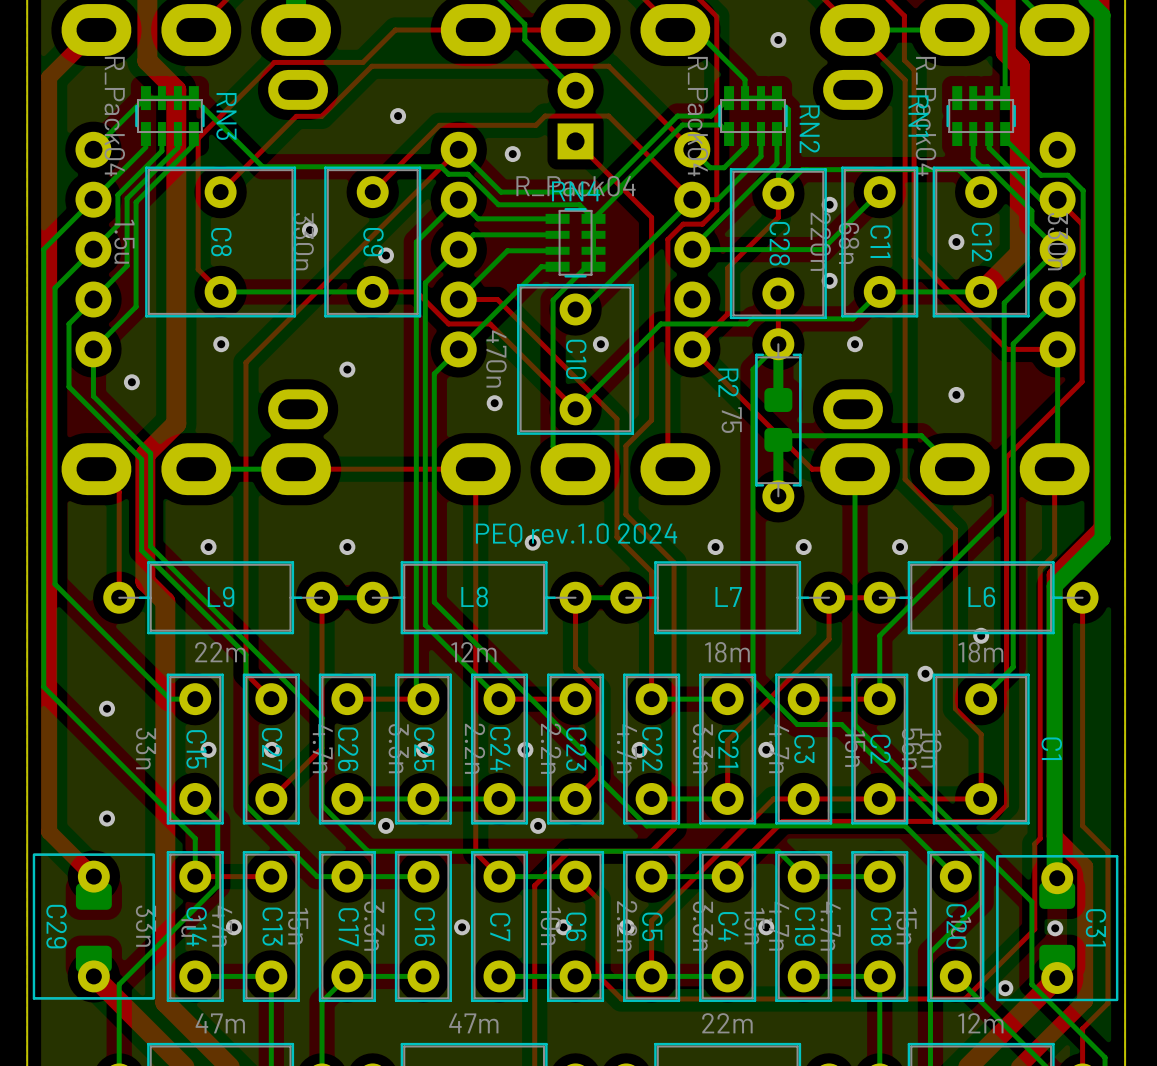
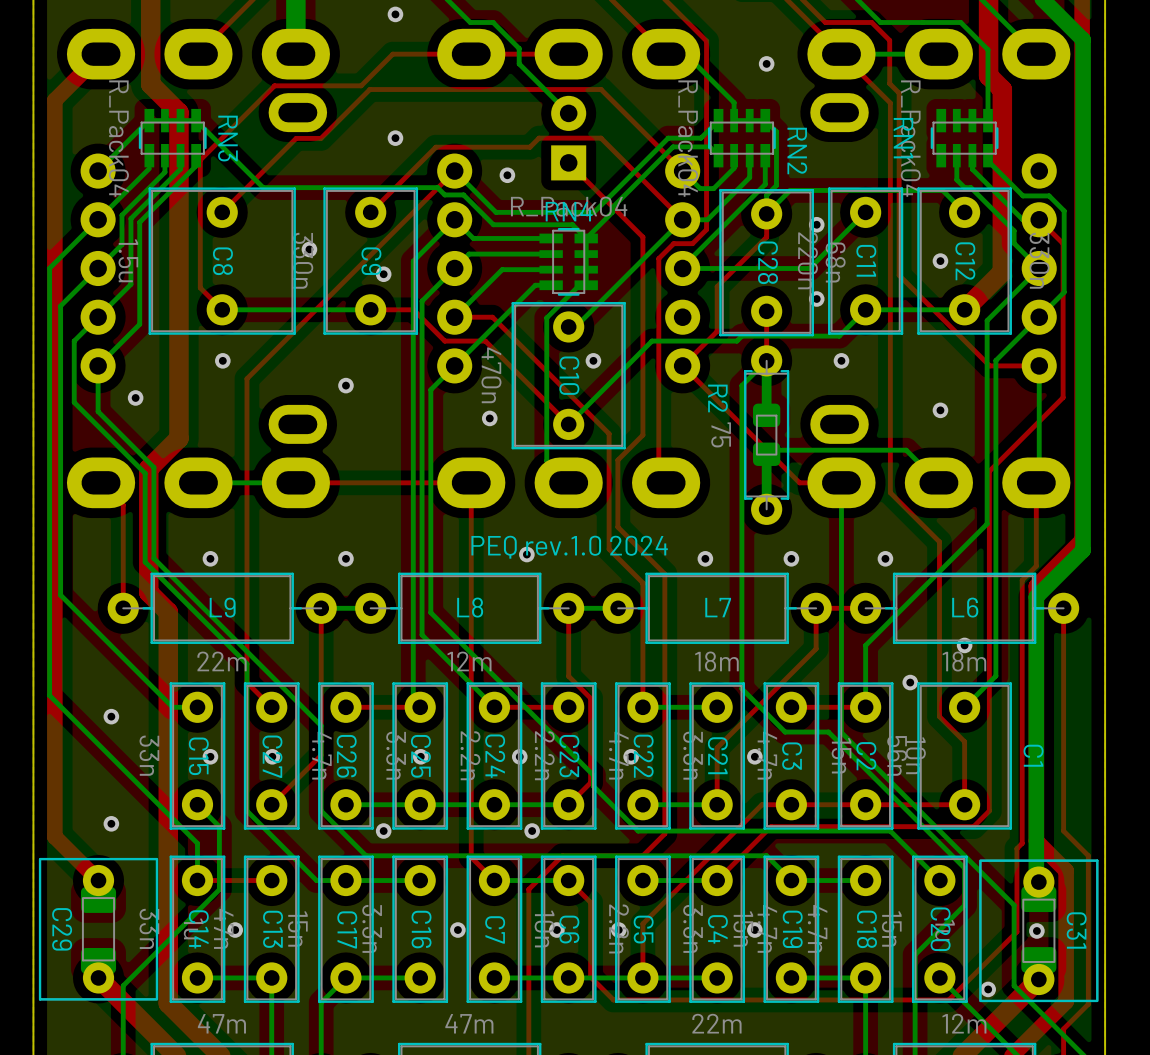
R2 footprint: [755, 328, 802, 513] -> [744, 345, 790, 525]
C29 footprint: [32, 853, 155, 1000] -> [38, 857, 159, 1001]
C31 footprint: [996, 855, 1119, 1002] -> [979, 859, 1099, 1003]

